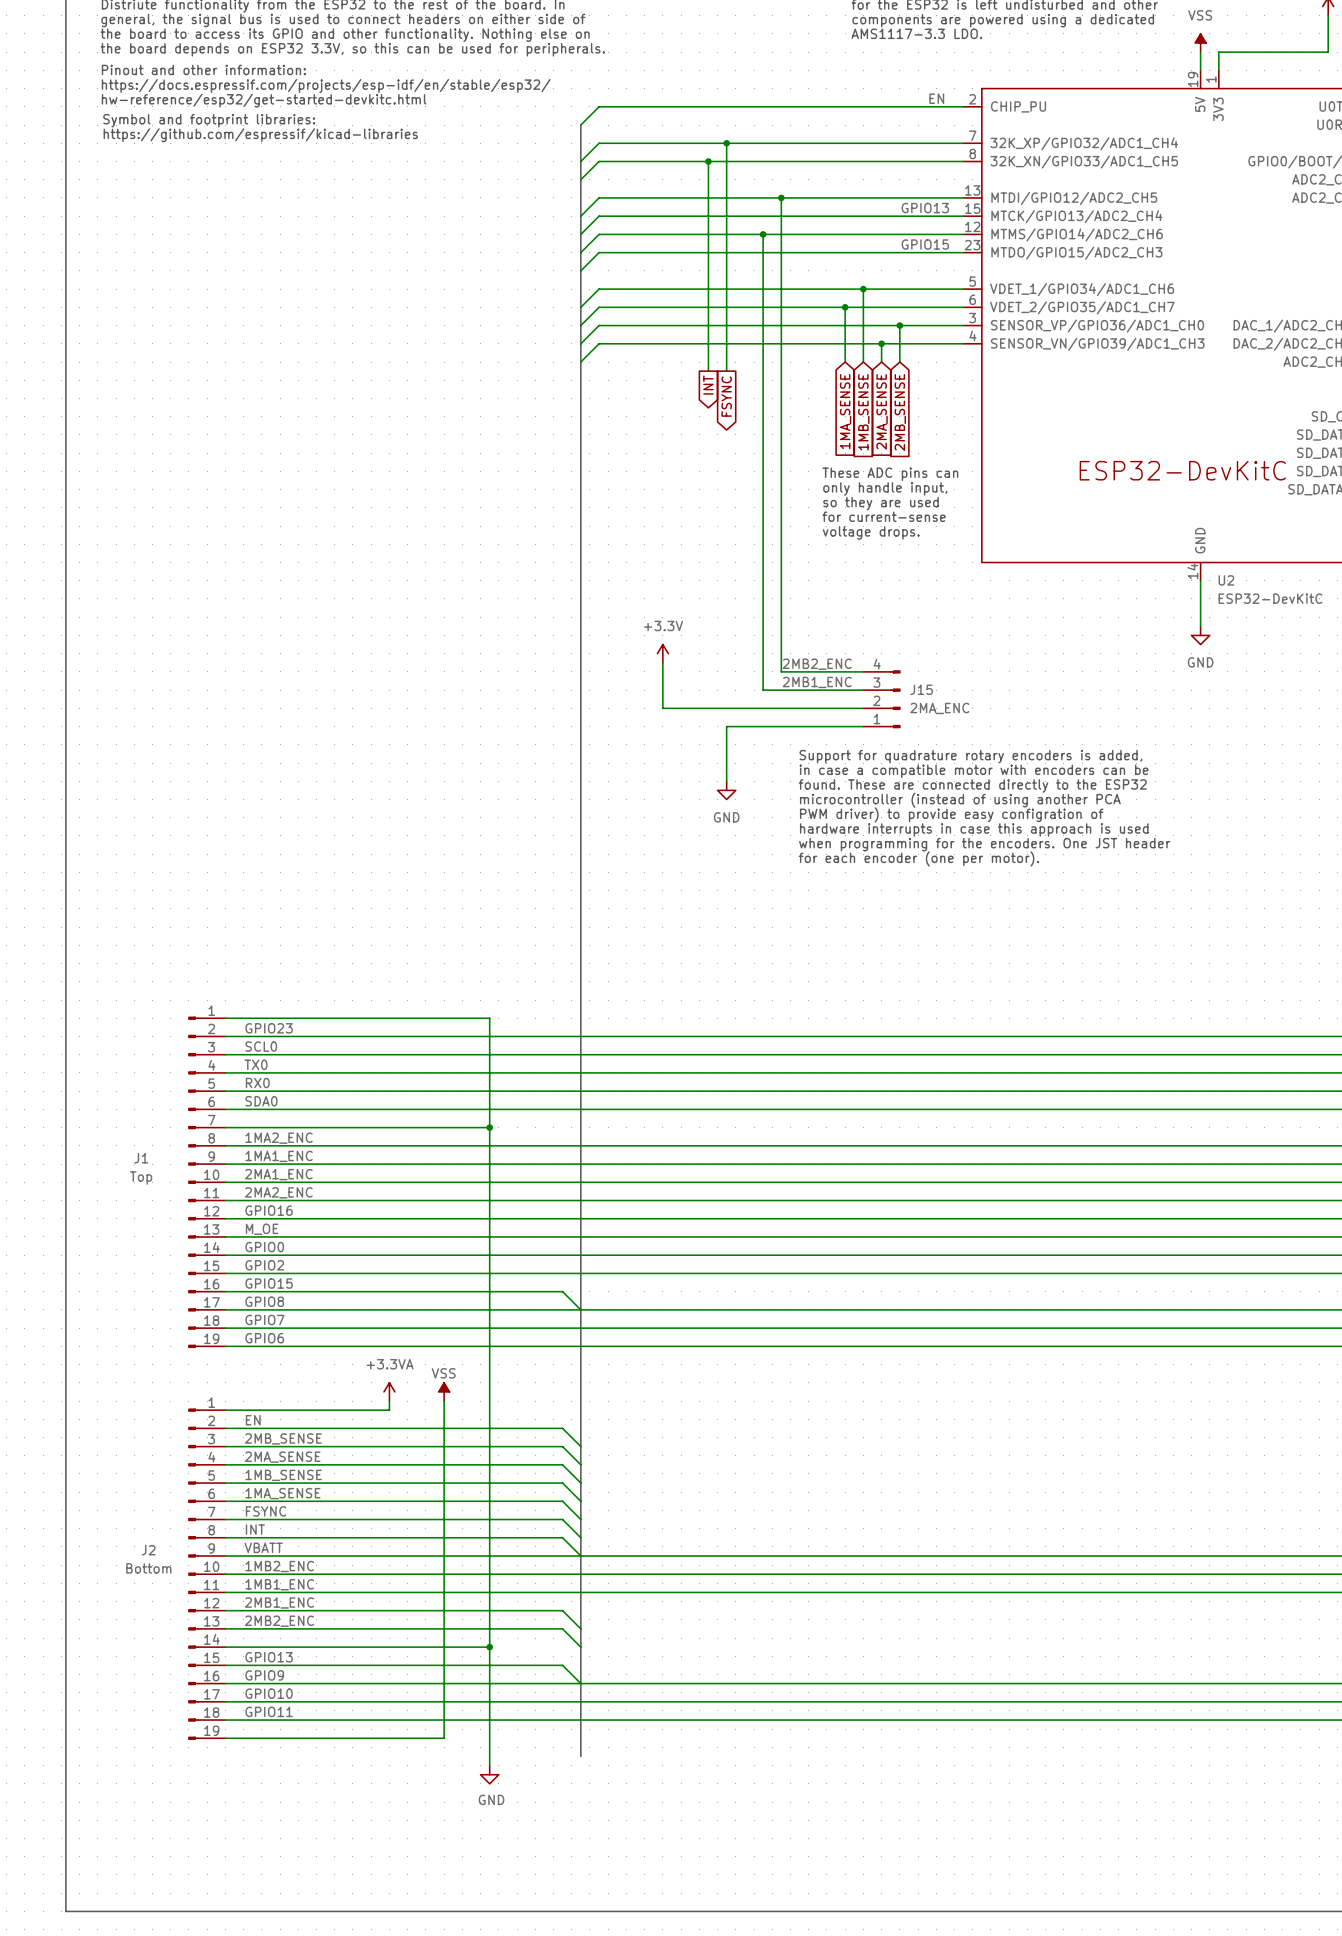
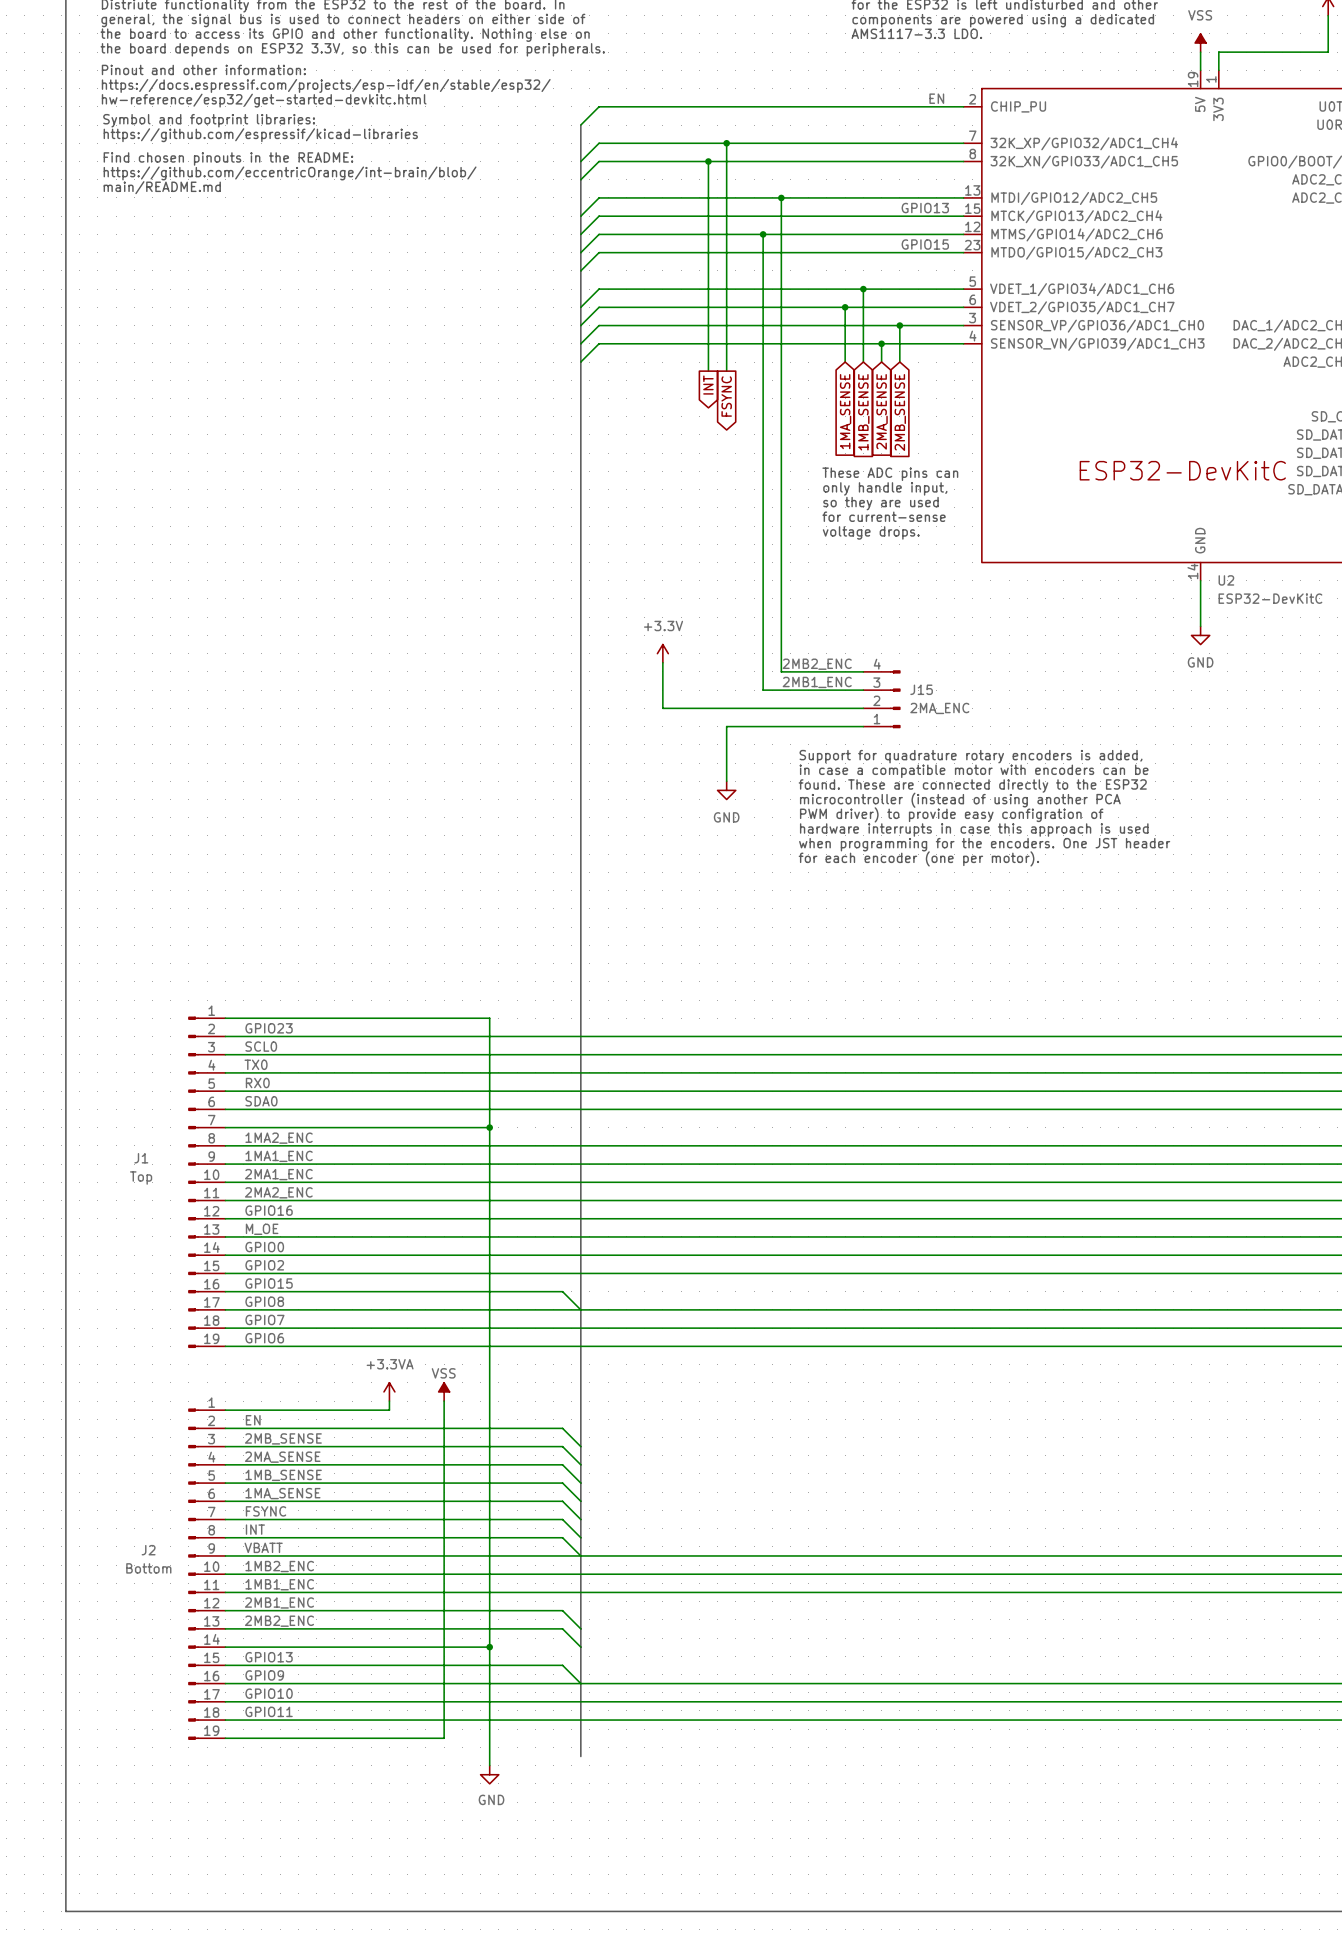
text: none -> Find chosen pinouts in the README: (228, 158)
text: none -> https://github.com/eccentricOrange/int-brain/blob/ (290, 173)
text: none -> main/README.md (162, 187)

